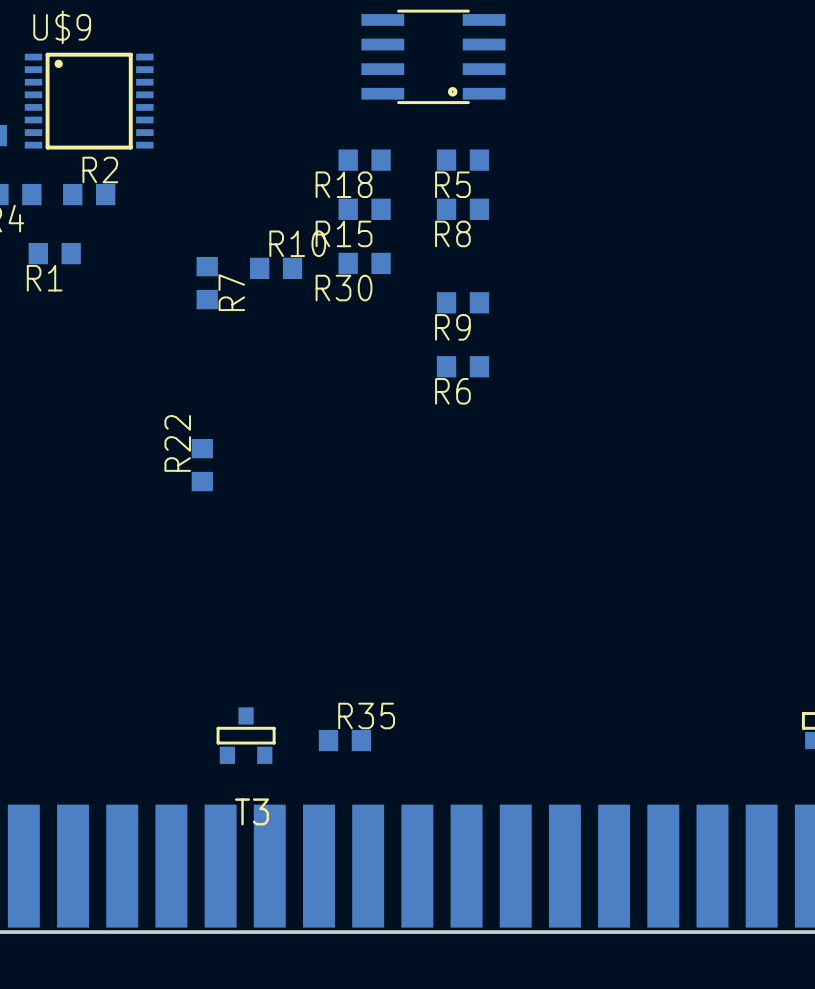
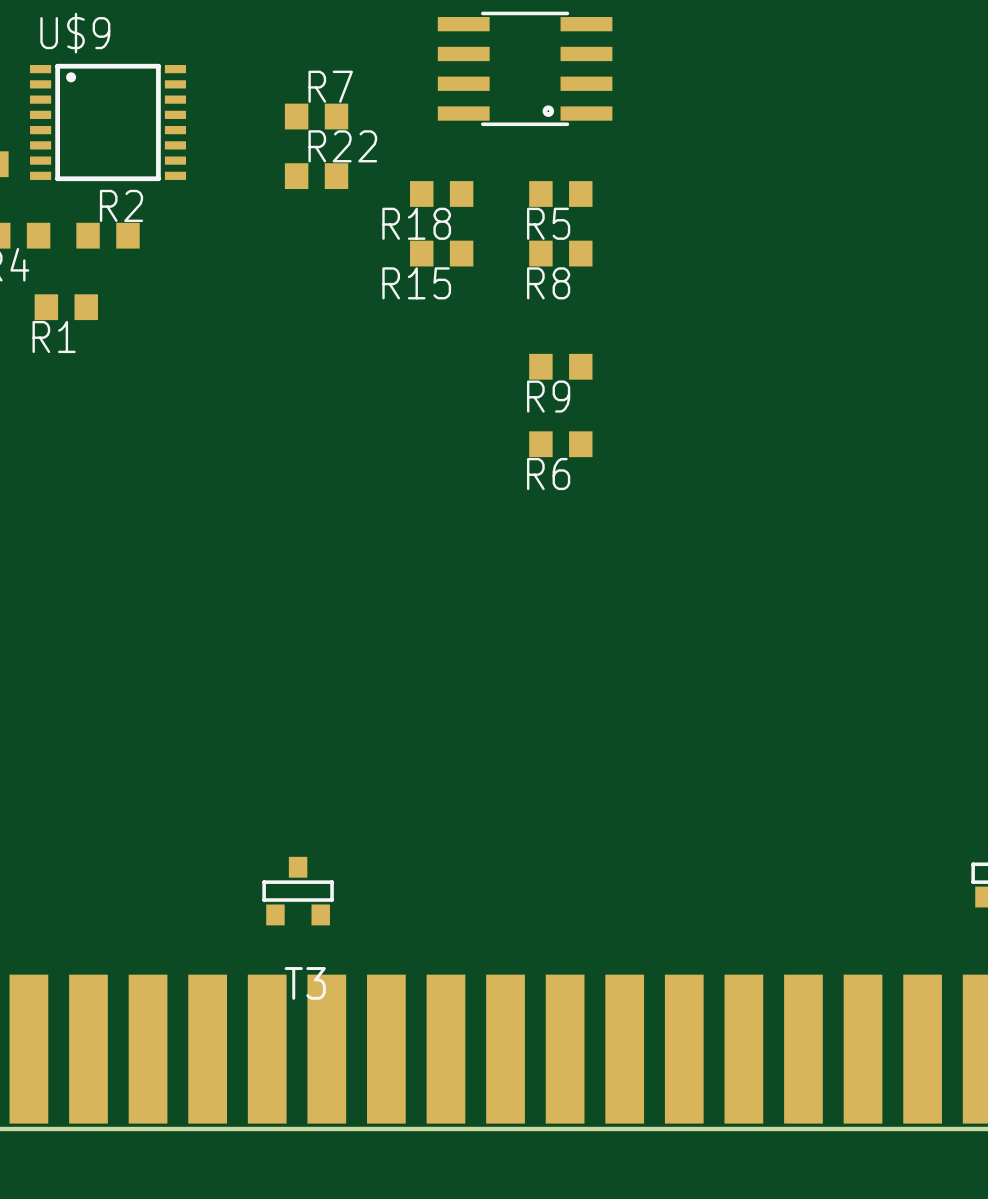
R30: (364, 263) -> none
R10: (276, 268) -> none
R7 rotation: 0° (207, 283) -> 90° clockwise (316, 116)
R7 position: (207, 283) -> (316, 116)
R7 name position: R7 (231, 292) -> R7 (330, 86)
R22 rotation: 0° (202, 465) -> 90° clockwise (316, 176)
R22 position: (202, 465) -> (316, 176)
R35: (344, 740) -> none

